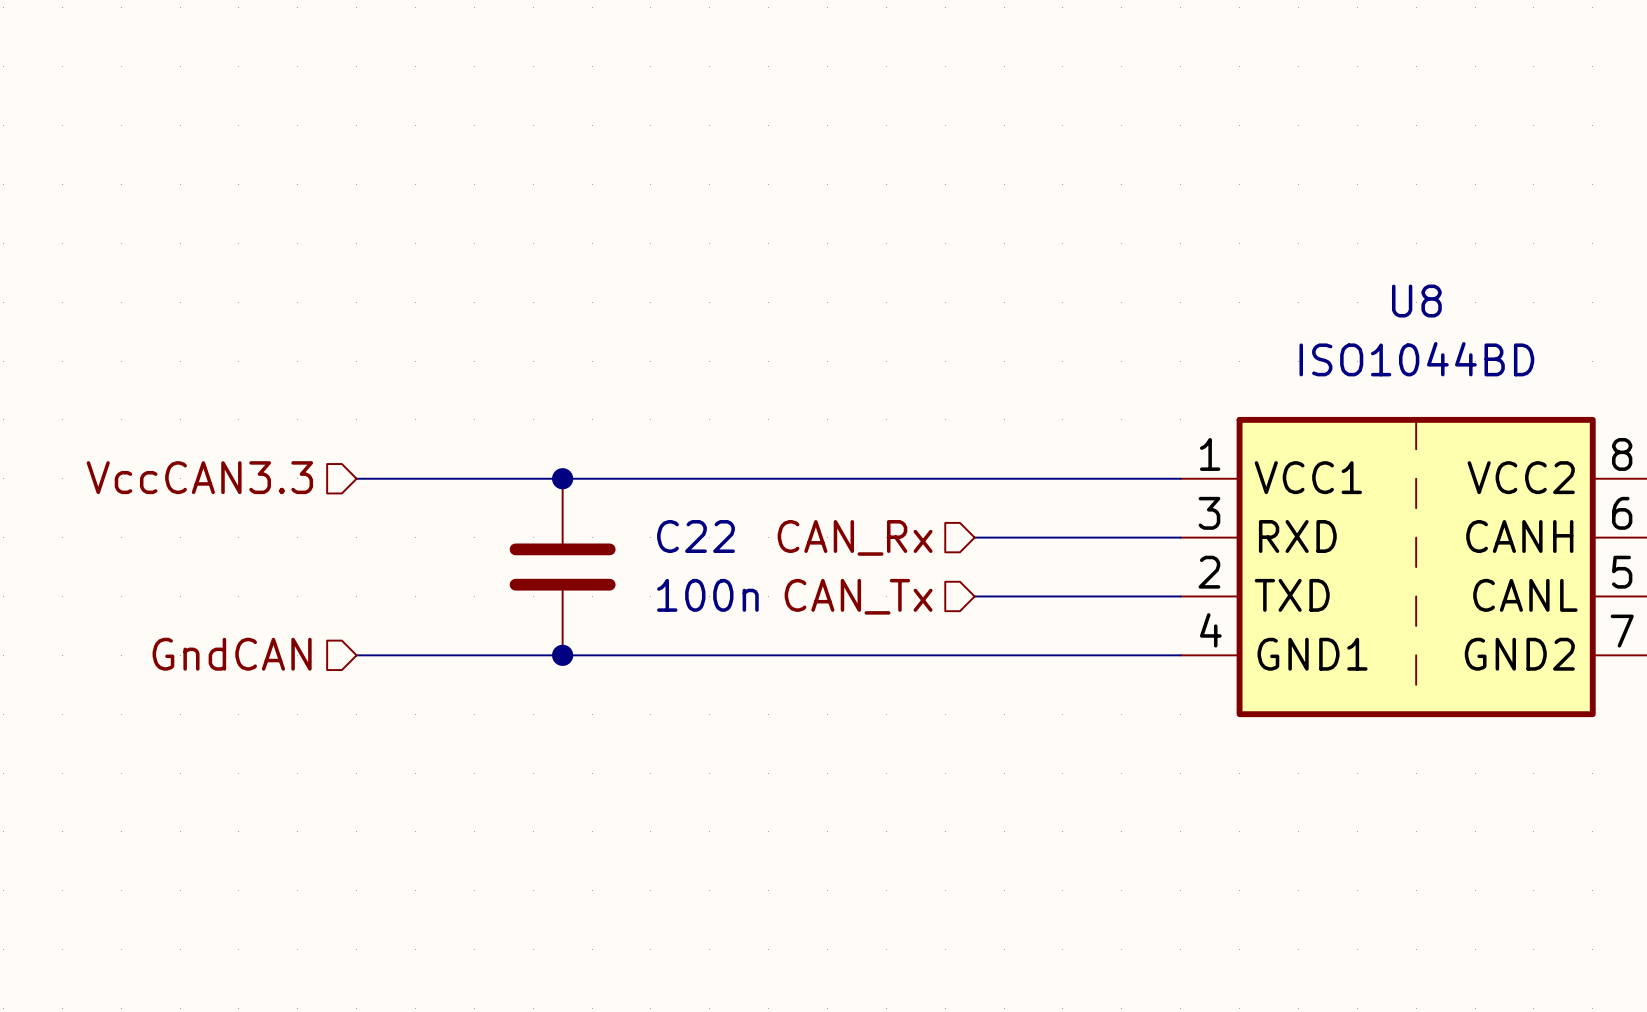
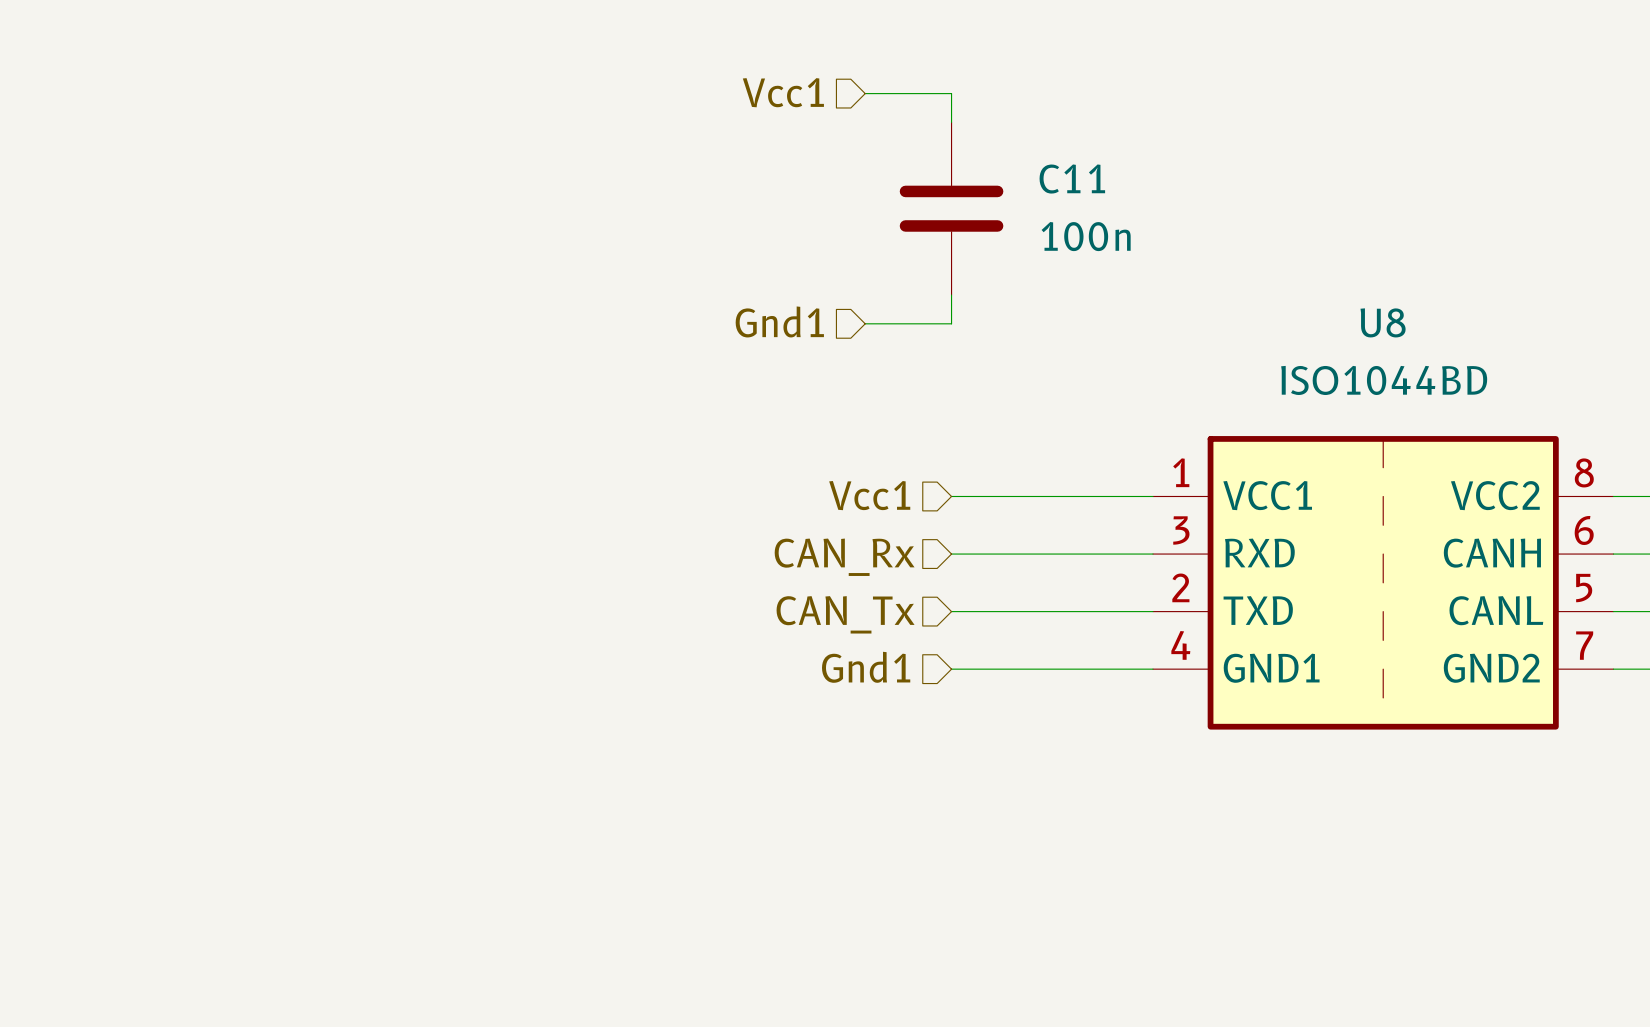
hierarchical label: none -> Vcc1 (783, 92)
wire: none -> (865, 93) (951, 93) (951, 122)
C11: none -> 100n (951, 208)
wire: none -> (951, 295) (951, 323) (865, 323)
hierarchical label: none -> Gnd1 (779, 321)
hierarchical label: VccCAN3.3 (199, 477) -> none
hierarchical label: none -> Vcc1 (869, 495)
wire: (356, 478) (974, 478) -> none
junction: (562, 478) -> none
C22: 100n (562, 567) -> none
hierarchical label: GndCAN (232, 654) -> none
hierarchical label: none -> Gnd1 (866, 667)
wire: (356, 655) (974, 655) -> none
junction: (562, 655) -> none

